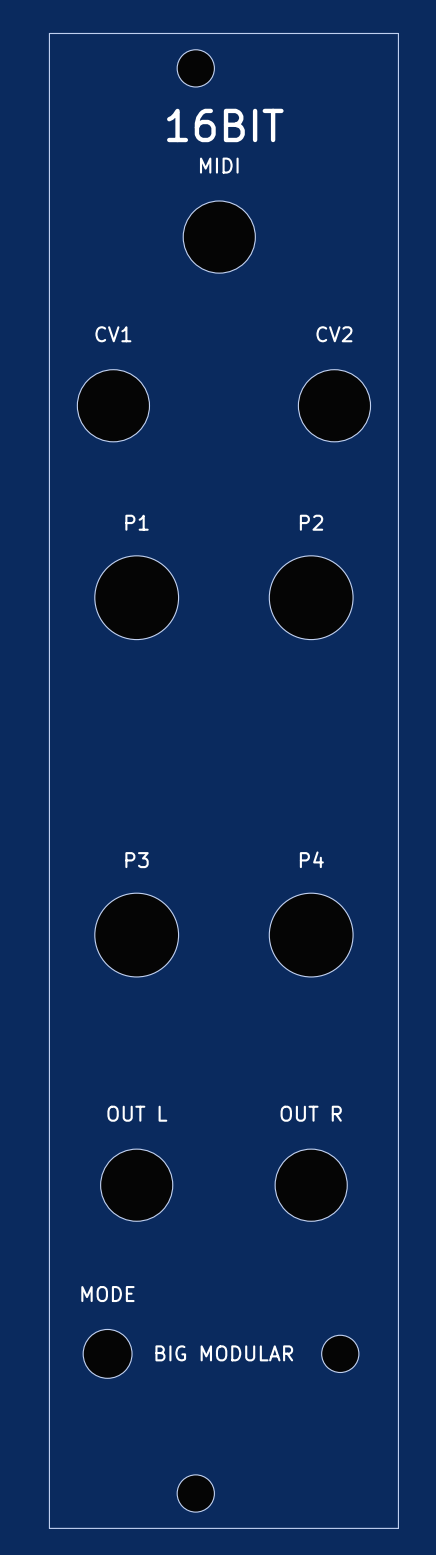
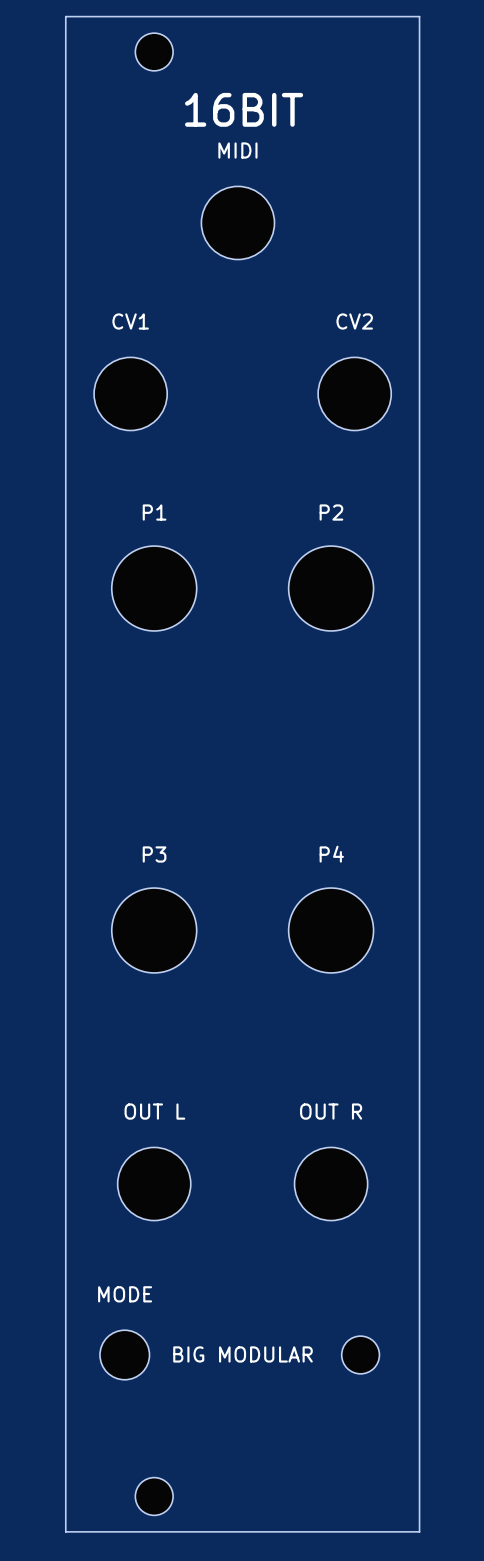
part position: (195, 68) -> (154, 51)
part position: (195, 1493) -> (154, 1496)

